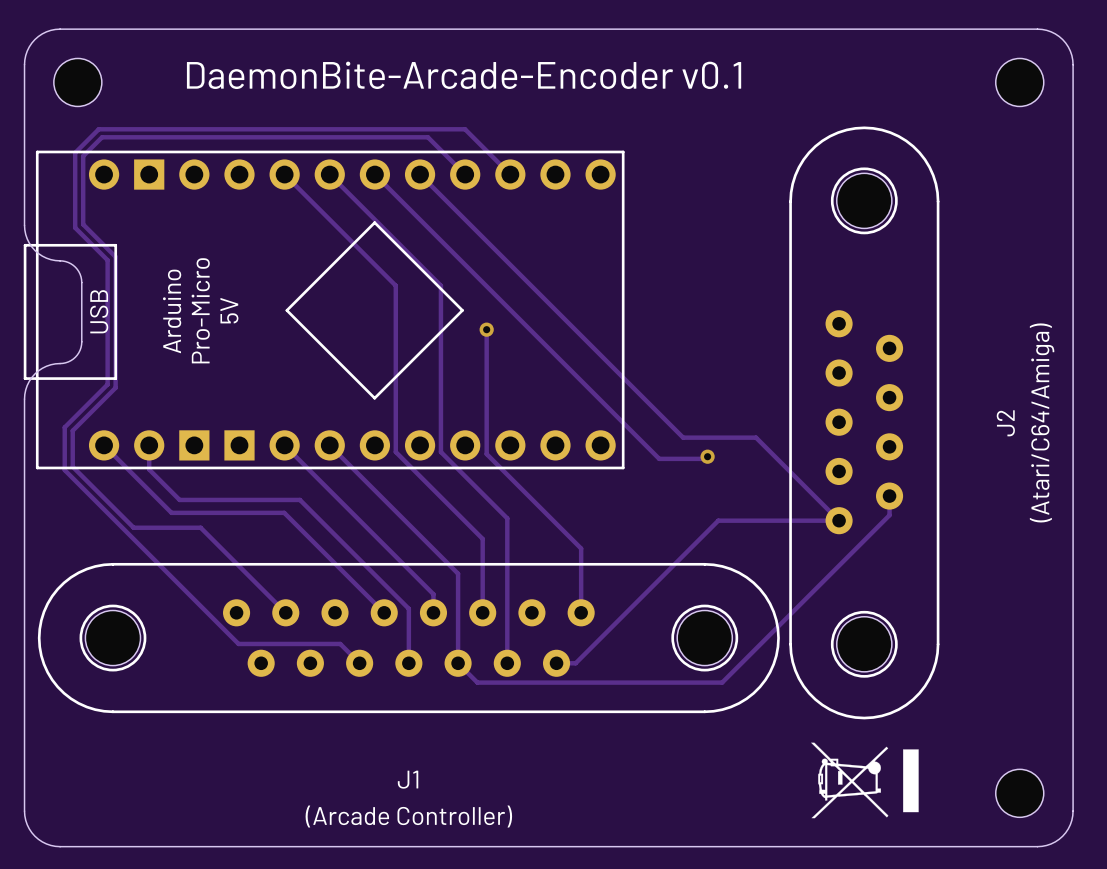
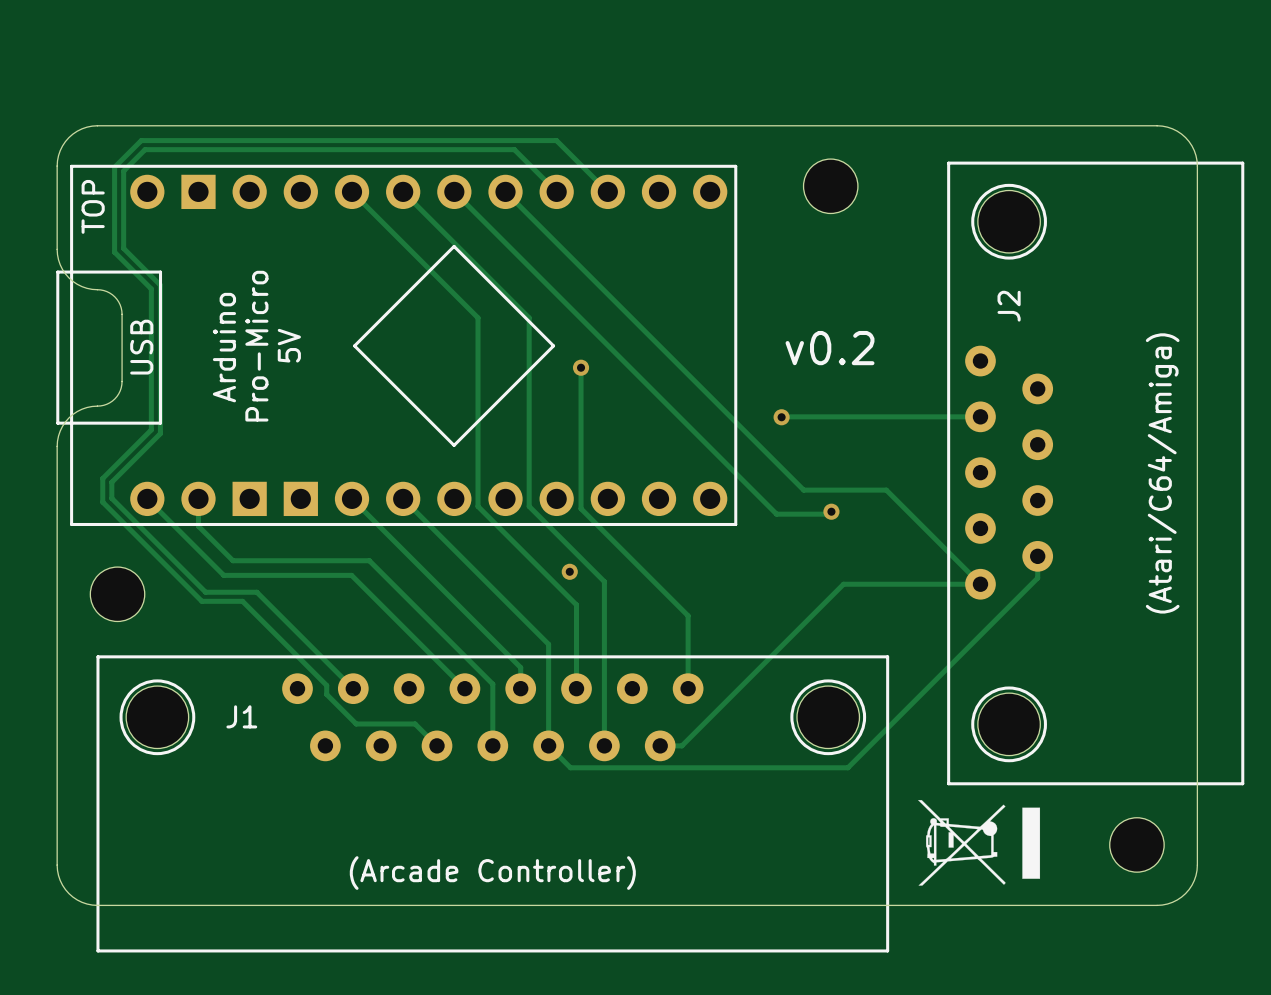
text: DaemonBite-Arcade-Encoder v0.1 (464, 75) -> none
part: (77, 82) -> none
part: (1019, 82) -> none
J2 footprint: [789, 126, 940, 720] -> [947, 161, 1245, 786]
board edge: (24, 151) (25, 55) (29, 46) (38, 36) (55, 29) (1037, 29) (1046, 30) (1059, 36) (1068, 46) (1072, 60) (1073, 811) (1070, 824) (1059, 839) (1046, 845) (1037, 846) (55, 846) (38, 839) (27, 824) (24, 811) (24, 768) -> (57, 166) (60, 150) (68, 137) (82, 128) (97, 125) (1157, 125) (1172, 128) (1185, 137) (1194, 150) (1197, 166) (1197, 865) (1191, 885) (1177, 899) (1157, 905) (97, 905) (82, 902) (68, 893) (60, 880) (57, 865)
part: none -> (830, 186)
text: none -> TOP (93, 206)
text: none -> v0.2 (830, 348)
via: none -> (781, 417)
track: none -> (980, 416) (781, 417)
text position: (Atari/C64/Amiga) (1042, 422) -> (Atari/C64/Amiga) (1162, 473)
J2 name position: J2 (1005, 423) -> J2 (1009, 306)
track: (72, 444) (72, 466) (133, 527) (155, 527) -> (111, 498) (205, 592)
track: (64, 448) (64, 470) (238, 643) (288, 643) -> (102, 502) (201, 601) (242, 601) (326, 685) (326, 694) (356, 723)
via: none -> (569, 571)
part: none -> (117, 594)
J1 footprint: [37, 562, 780, 714] -> [96, 655, 890, 953]
J1 name position: J1 (408, 779) -> J1 (241, 716)
drawing position: (864, 780) -> (979, 842)
part position: (1019, 793) -> (1136, 844)
text position: (Arcade Controller) (408, 816) -> (Arcade Controller) (492, 873)

